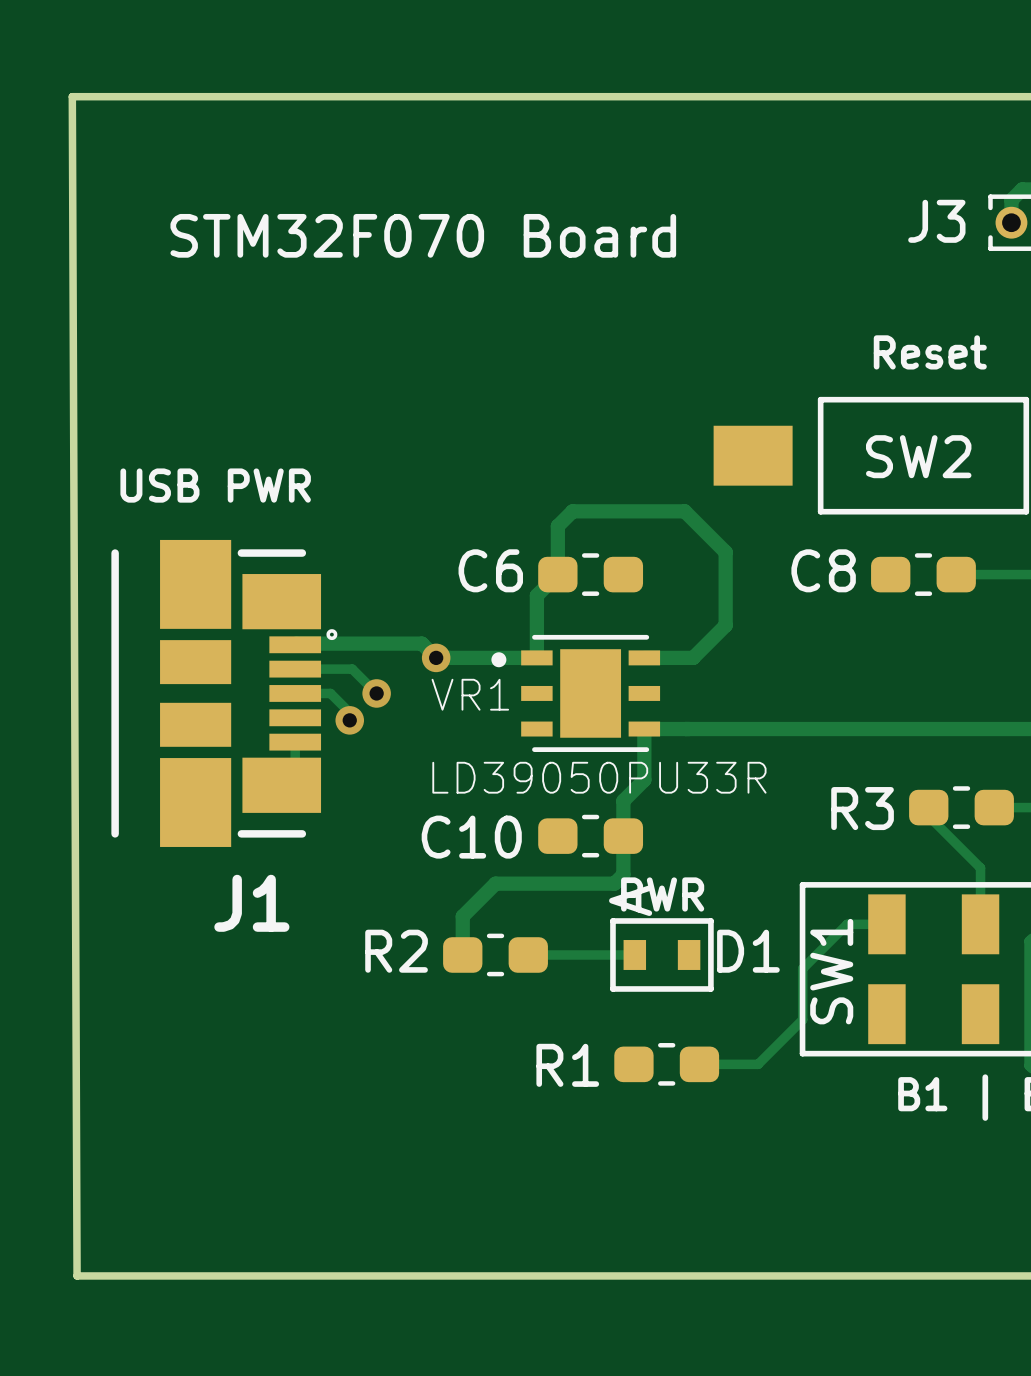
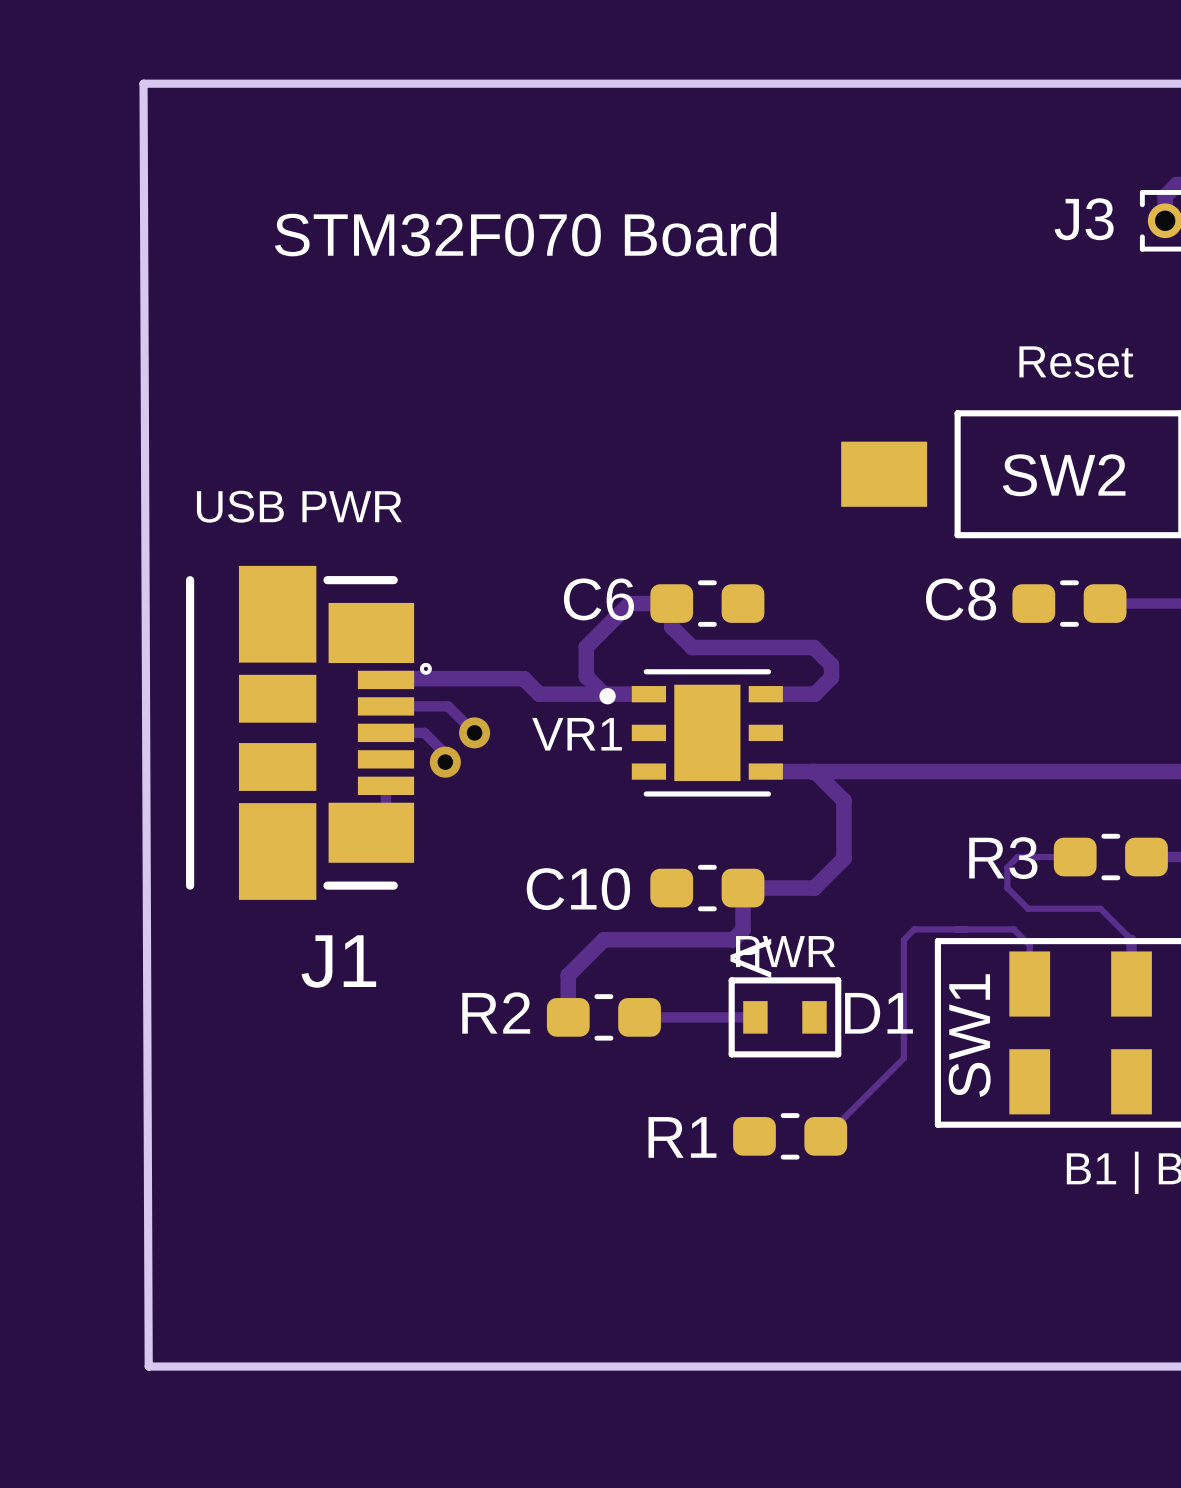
via: (436, 657) -> none
track: (536, 657) (536, 595) (557, 574) (557, 526) (572, 511) (684, 511) (725, 552) (725, 625) (693, 657) (689, 657) -> (603, 694) (586, 676) (586, 647) (629, 603) (671, 603) (671, 626) (692, 647) (813, 647) (831, 665) (831, 677) (814, 694)
track: (644, 729) (644, 780) (623, 800) (623, 836) -> (814, 771) (843, 800) (843, 858) (814, 888) (743, 888)
VR1 value: LD39050PU33R (599, 777) -> none
track: (928, 807) (928, 816) (980, 867) (980, 883) -> (1075, 857) (1017, 857) (1007, 867) (1007, 888) (1028, 908) (1100, 908) (1131, 939)
track: (886, 924) (847, 924) (802, 968) (802, 1019) (758, 1064) (699, 1064) -> (1029, 971) (1029, 945) (1013, 929) (914, 929) (903, 939) (903, 1058) (825, 1136)

